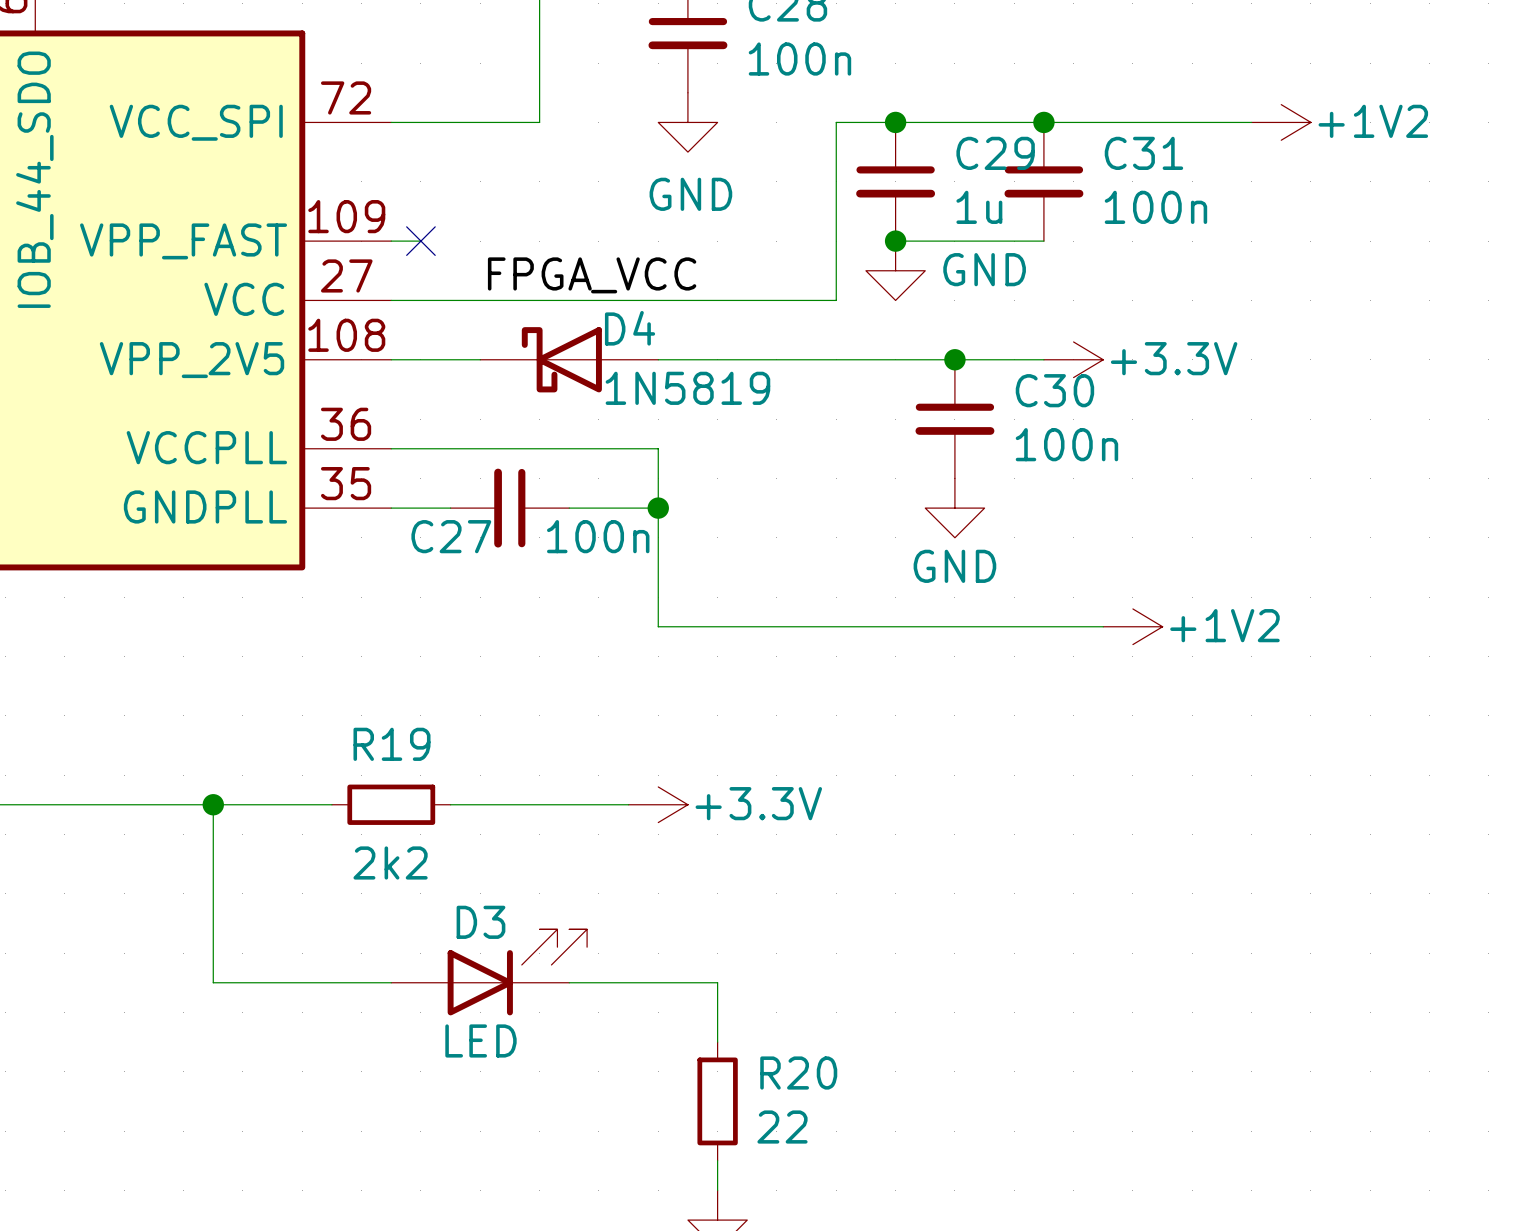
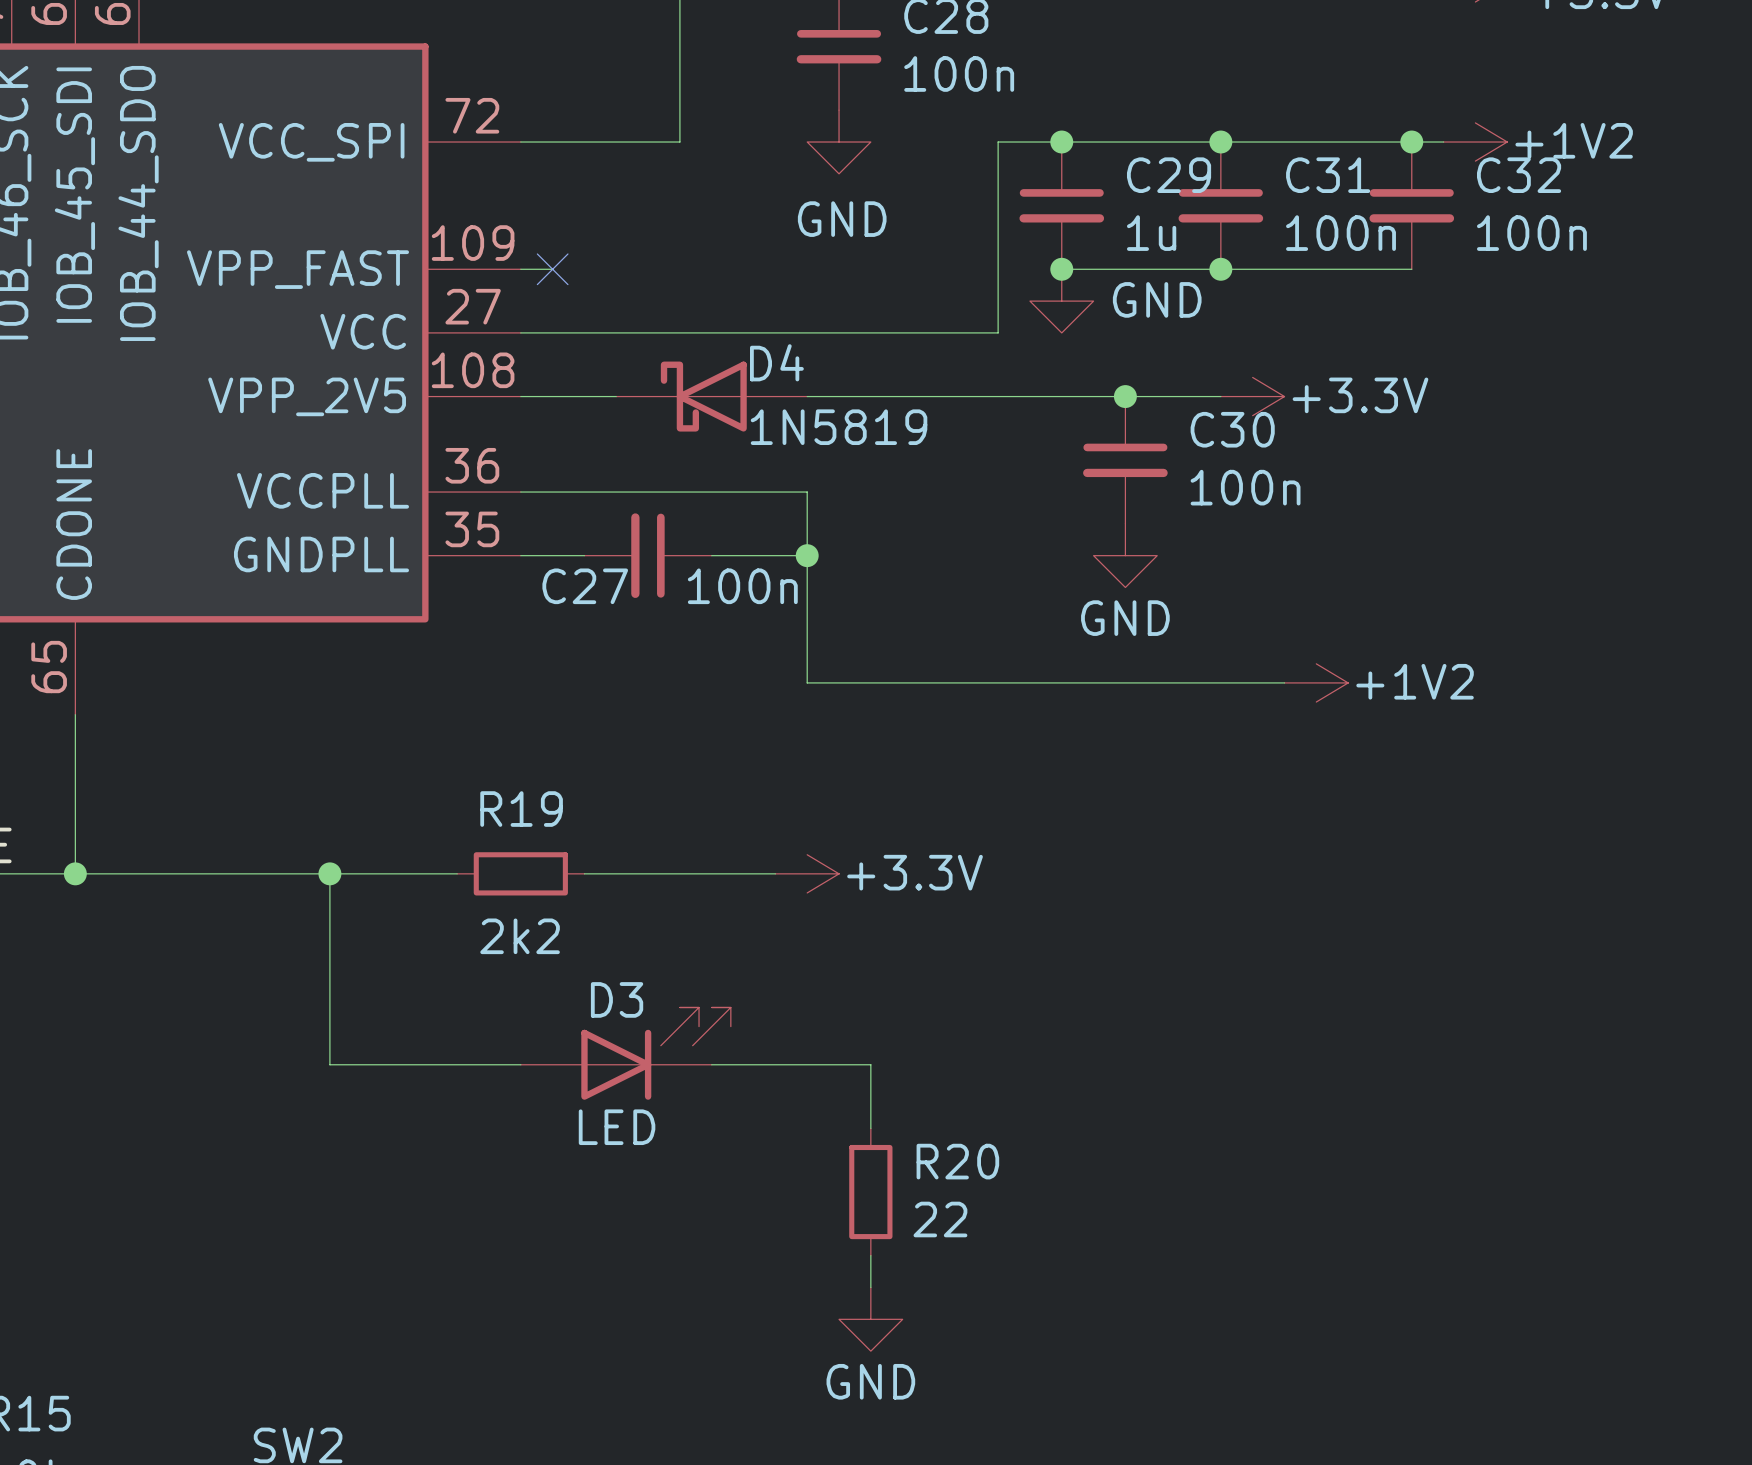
junction: none -> (1411, 142)
C32: none -> 100n (1411, 205)
wire: none -> (1220, 269) (1411, 269)
junction: none -> (1220, 269)
label: FPGA_VCC (592, 275) -> none

